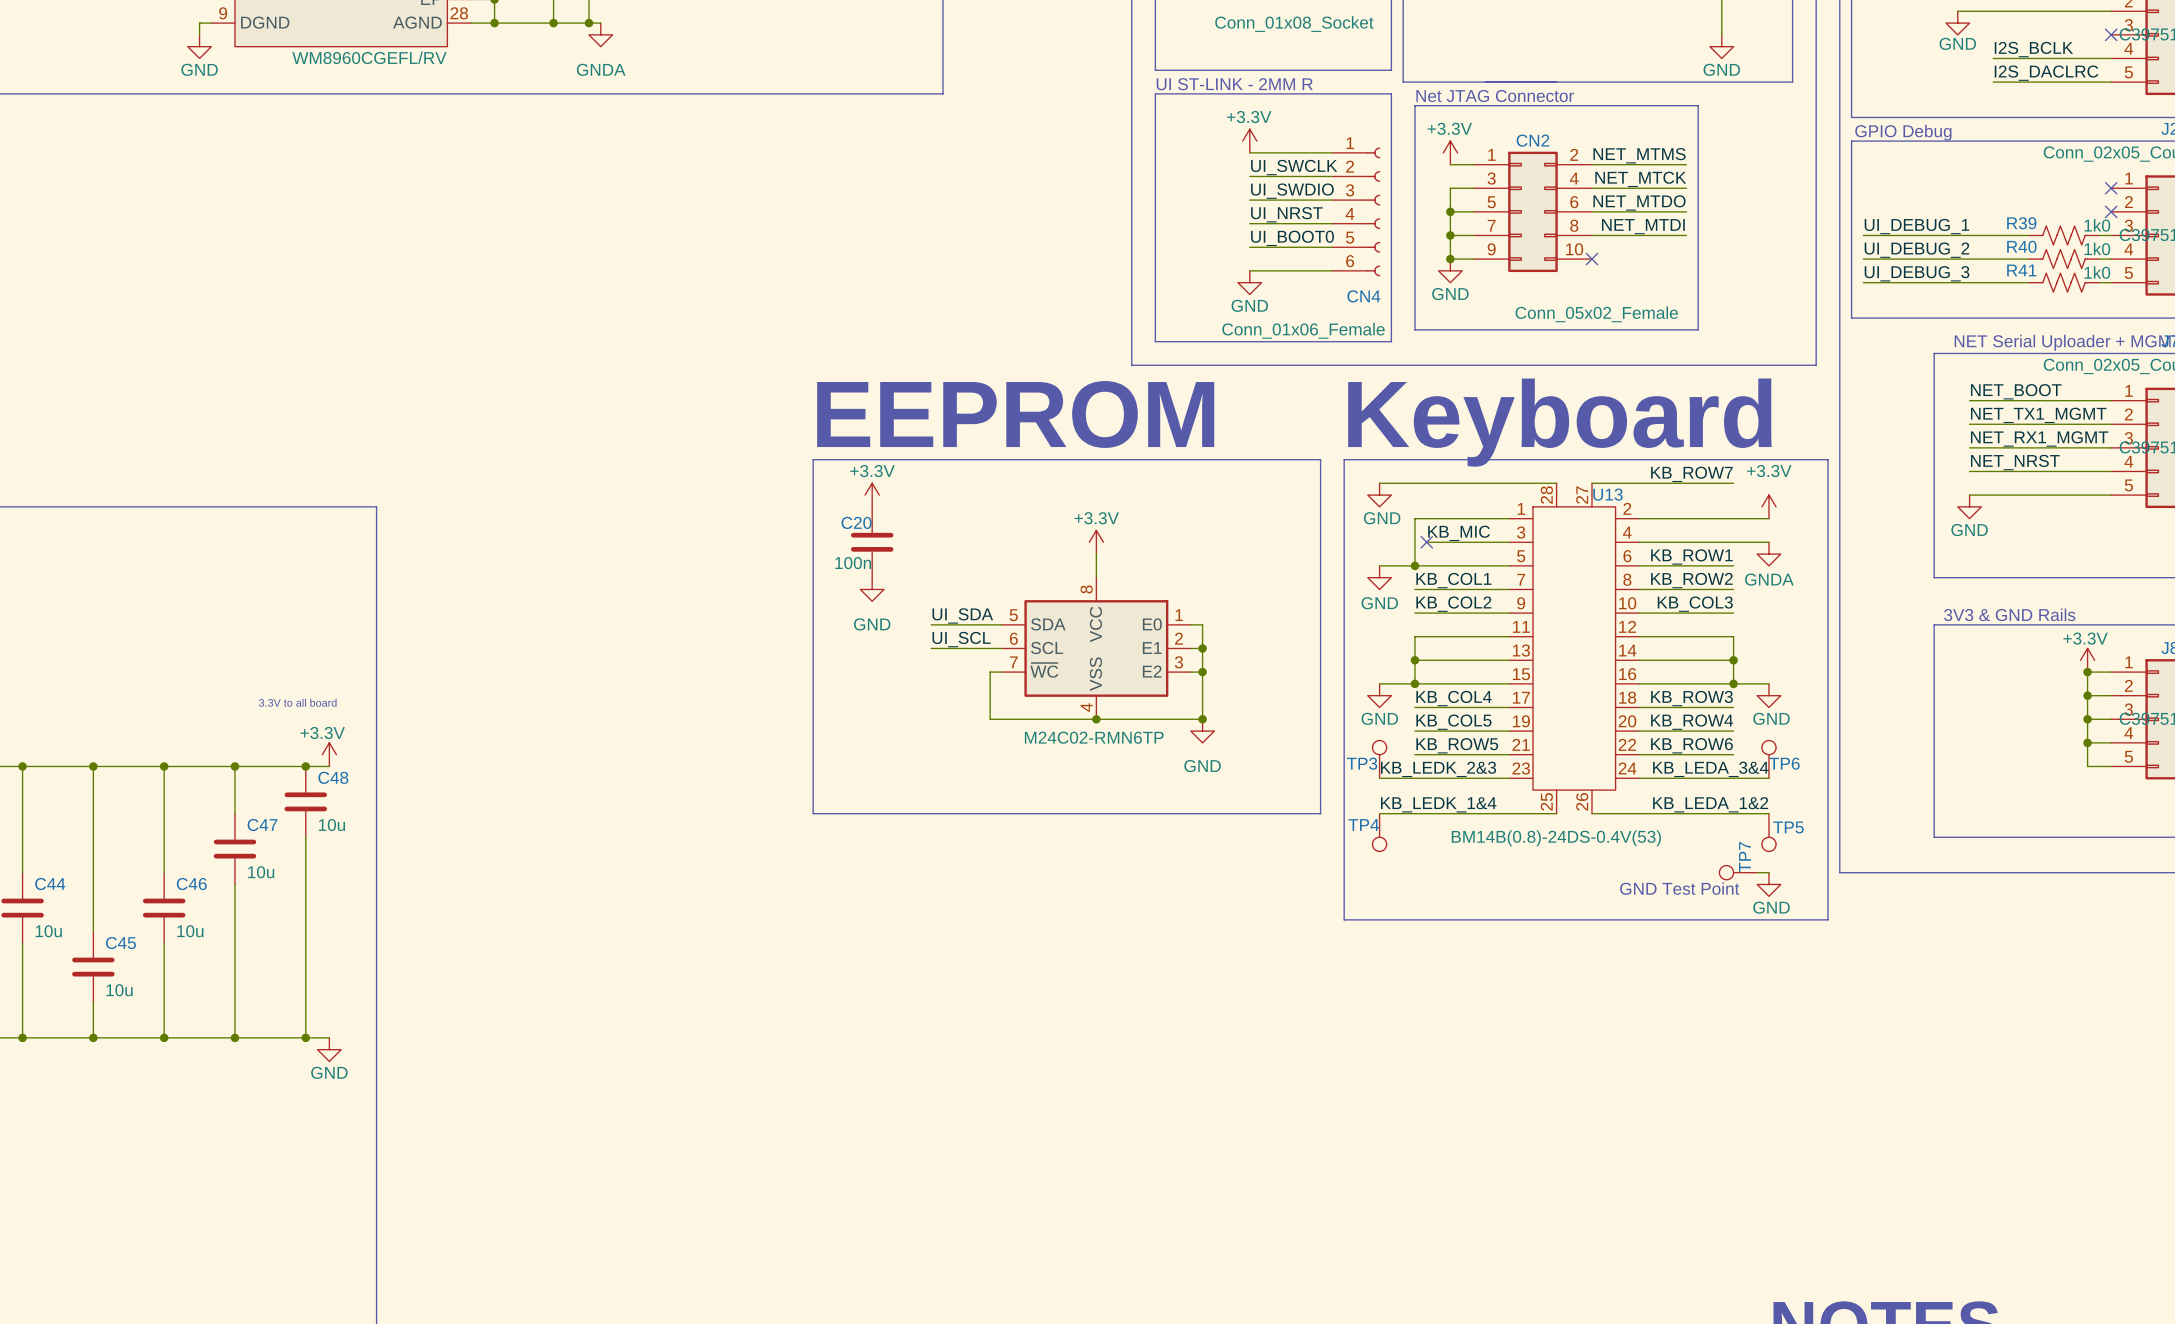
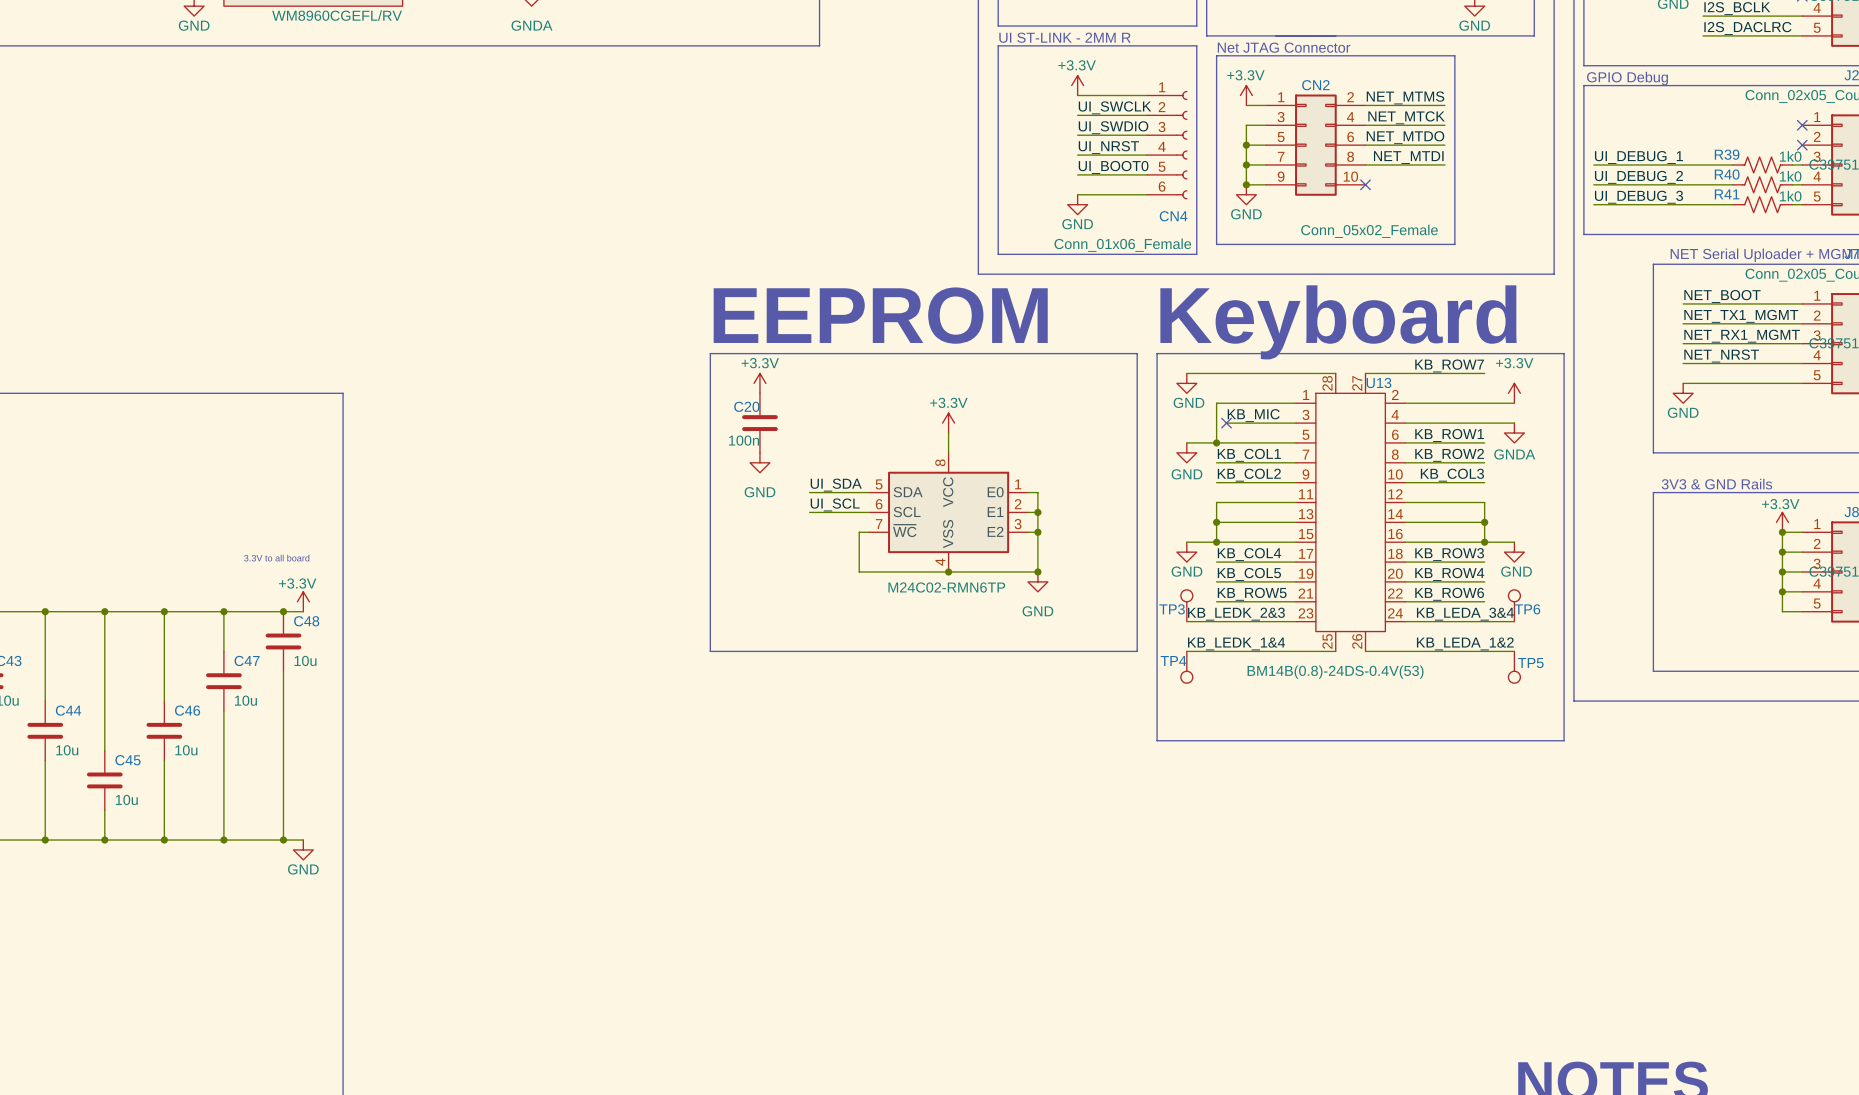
TP7: (1738, 872) -> none
wire: (1757, 872) (1768, 872) -> none
power symbol: GND (1768, 884) -> none
text: GND Test Point (1679, 888) -> none

